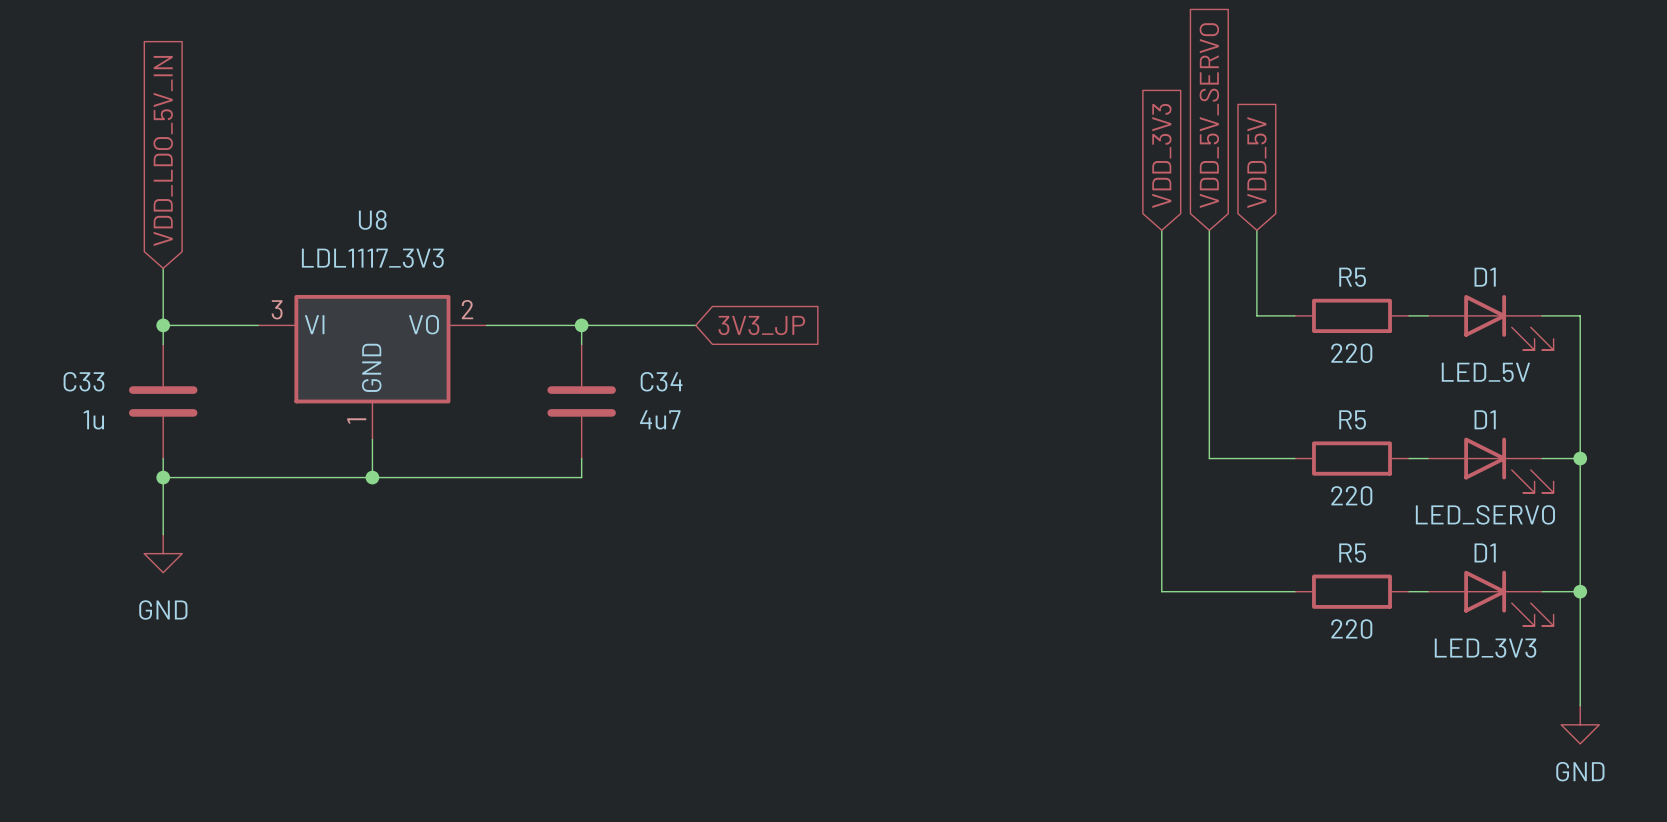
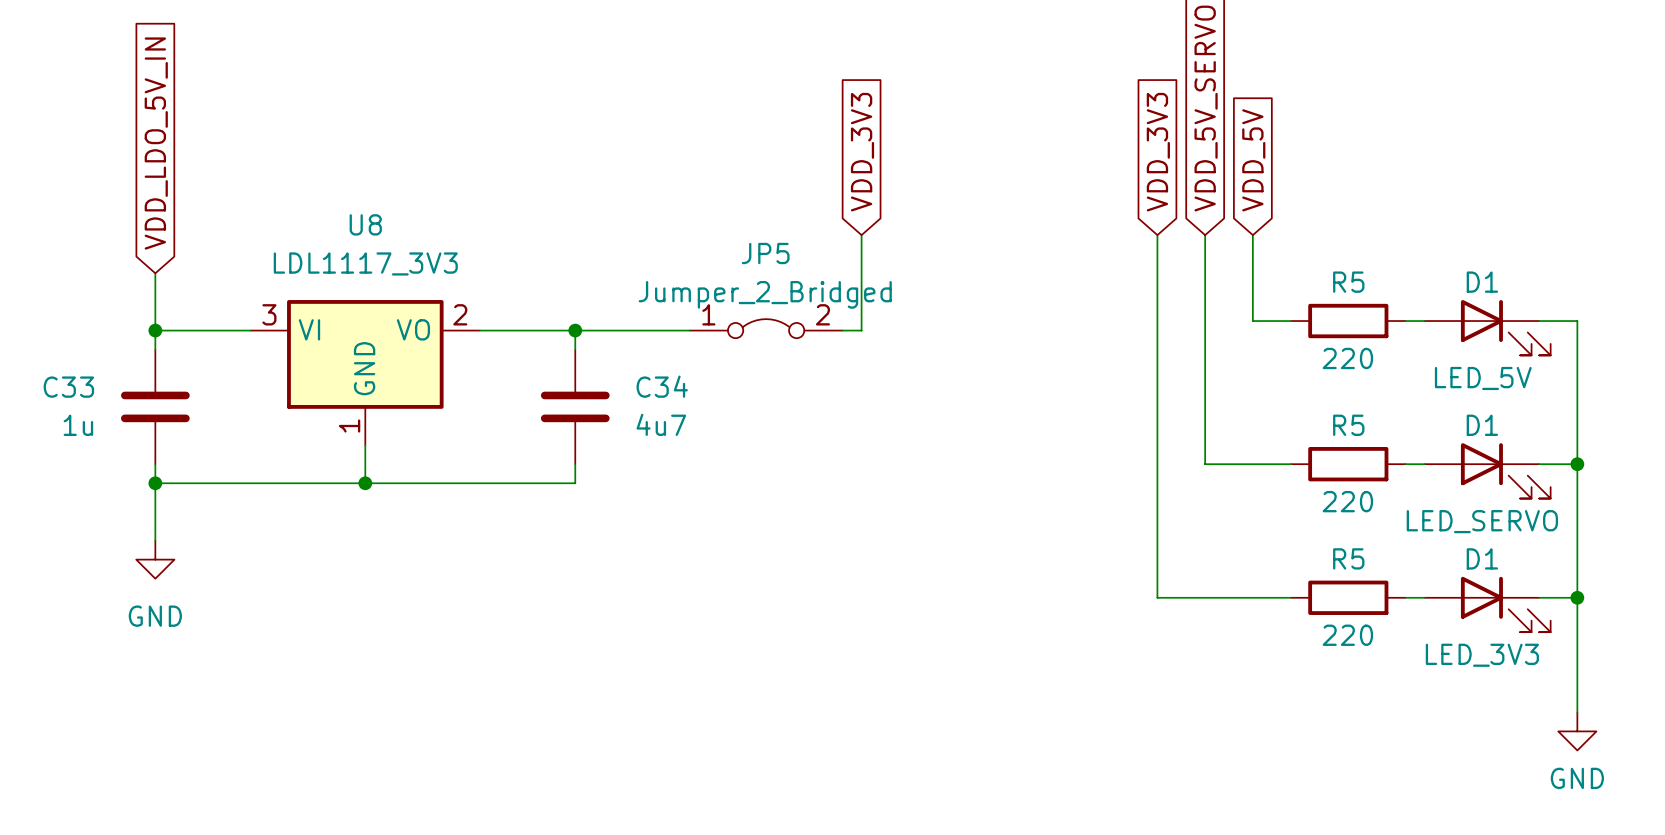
global label: none -> VDD_3V3 (862, 152)
wire: none -> (861, 235) (861, 330) (842, 330)
JP5: none -> Jumper_2_Bridged (766, 328)
global label: 3V3_JP (761, 325) -> none

